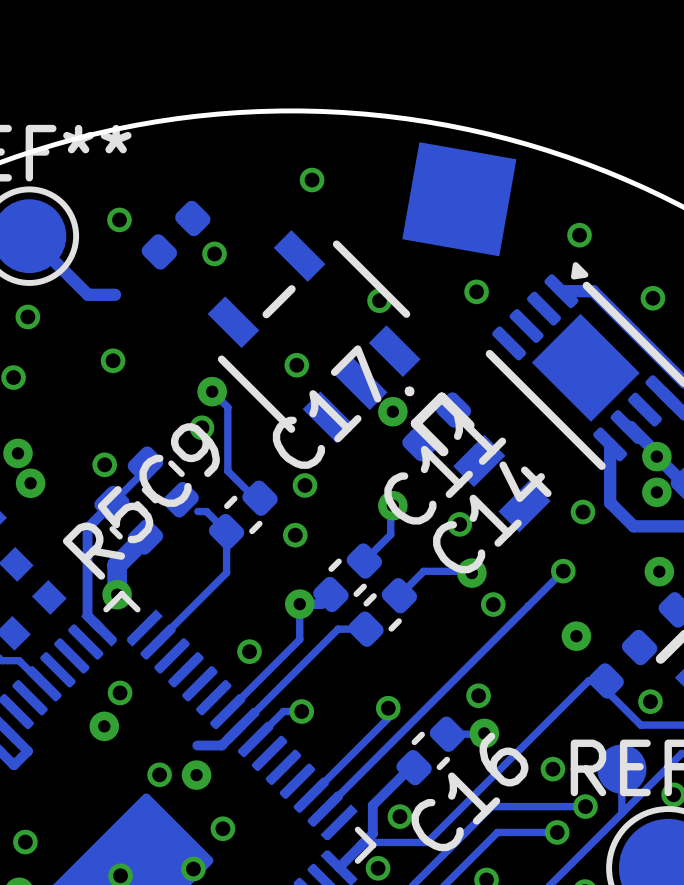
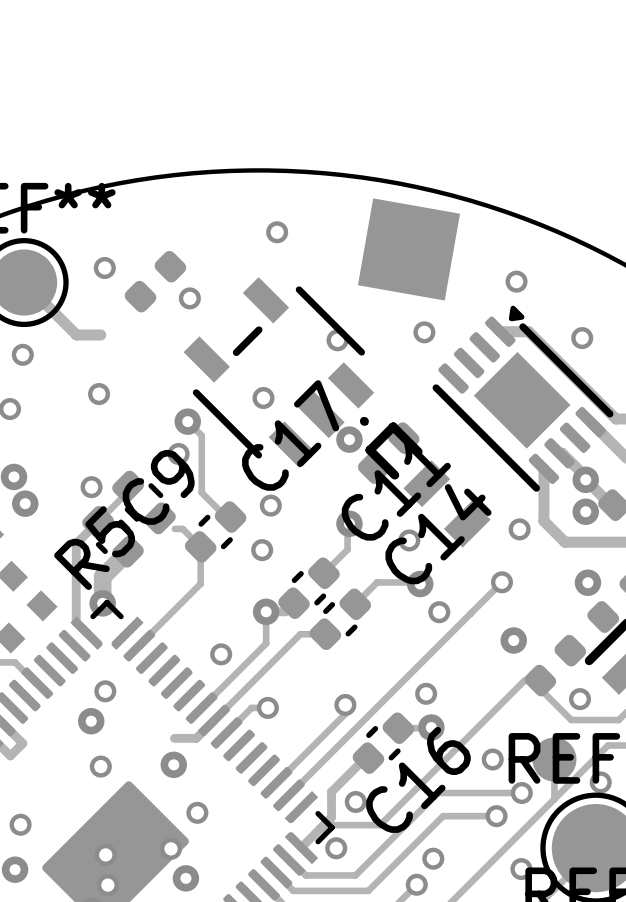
via position: (159, 774) -> (100, 766)

